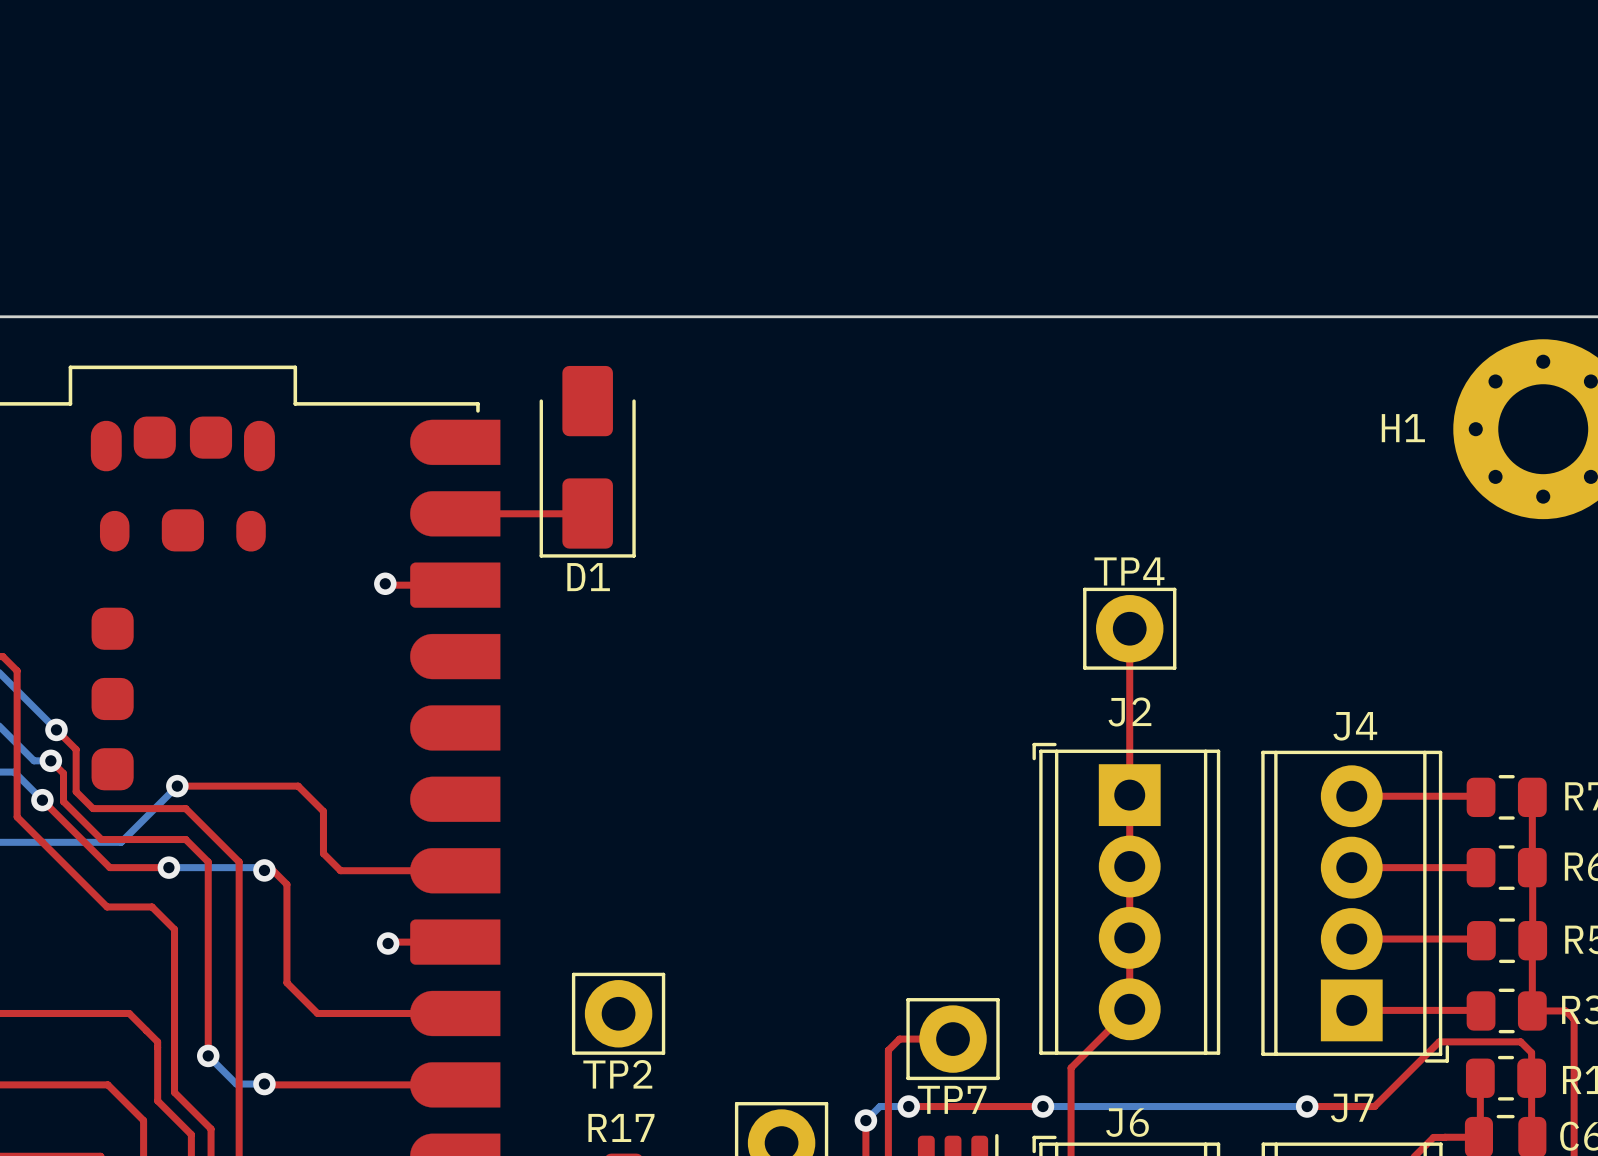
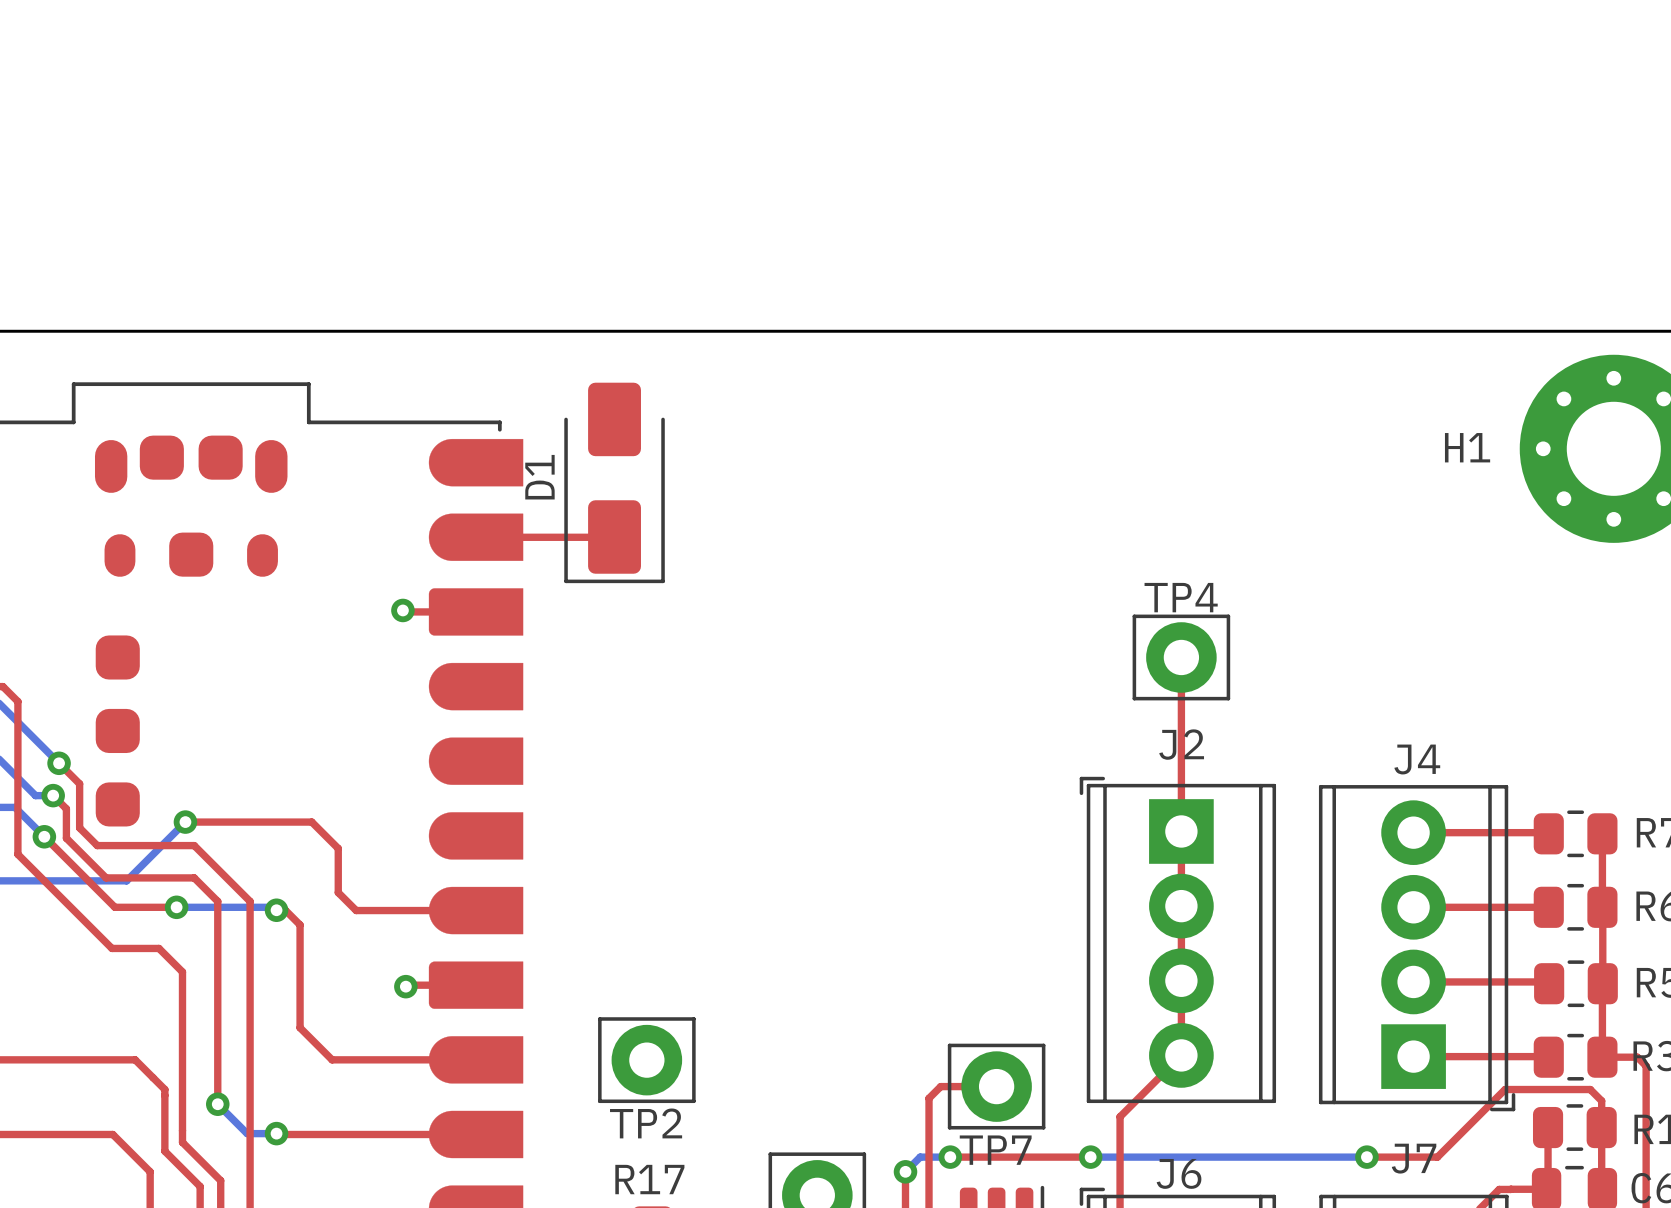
D1 name rotation: 0° (588, 577) -> 90° counterclockwise (539, 477)
D1 name position: D1 (588, 577) -> D1 (539, 477)

